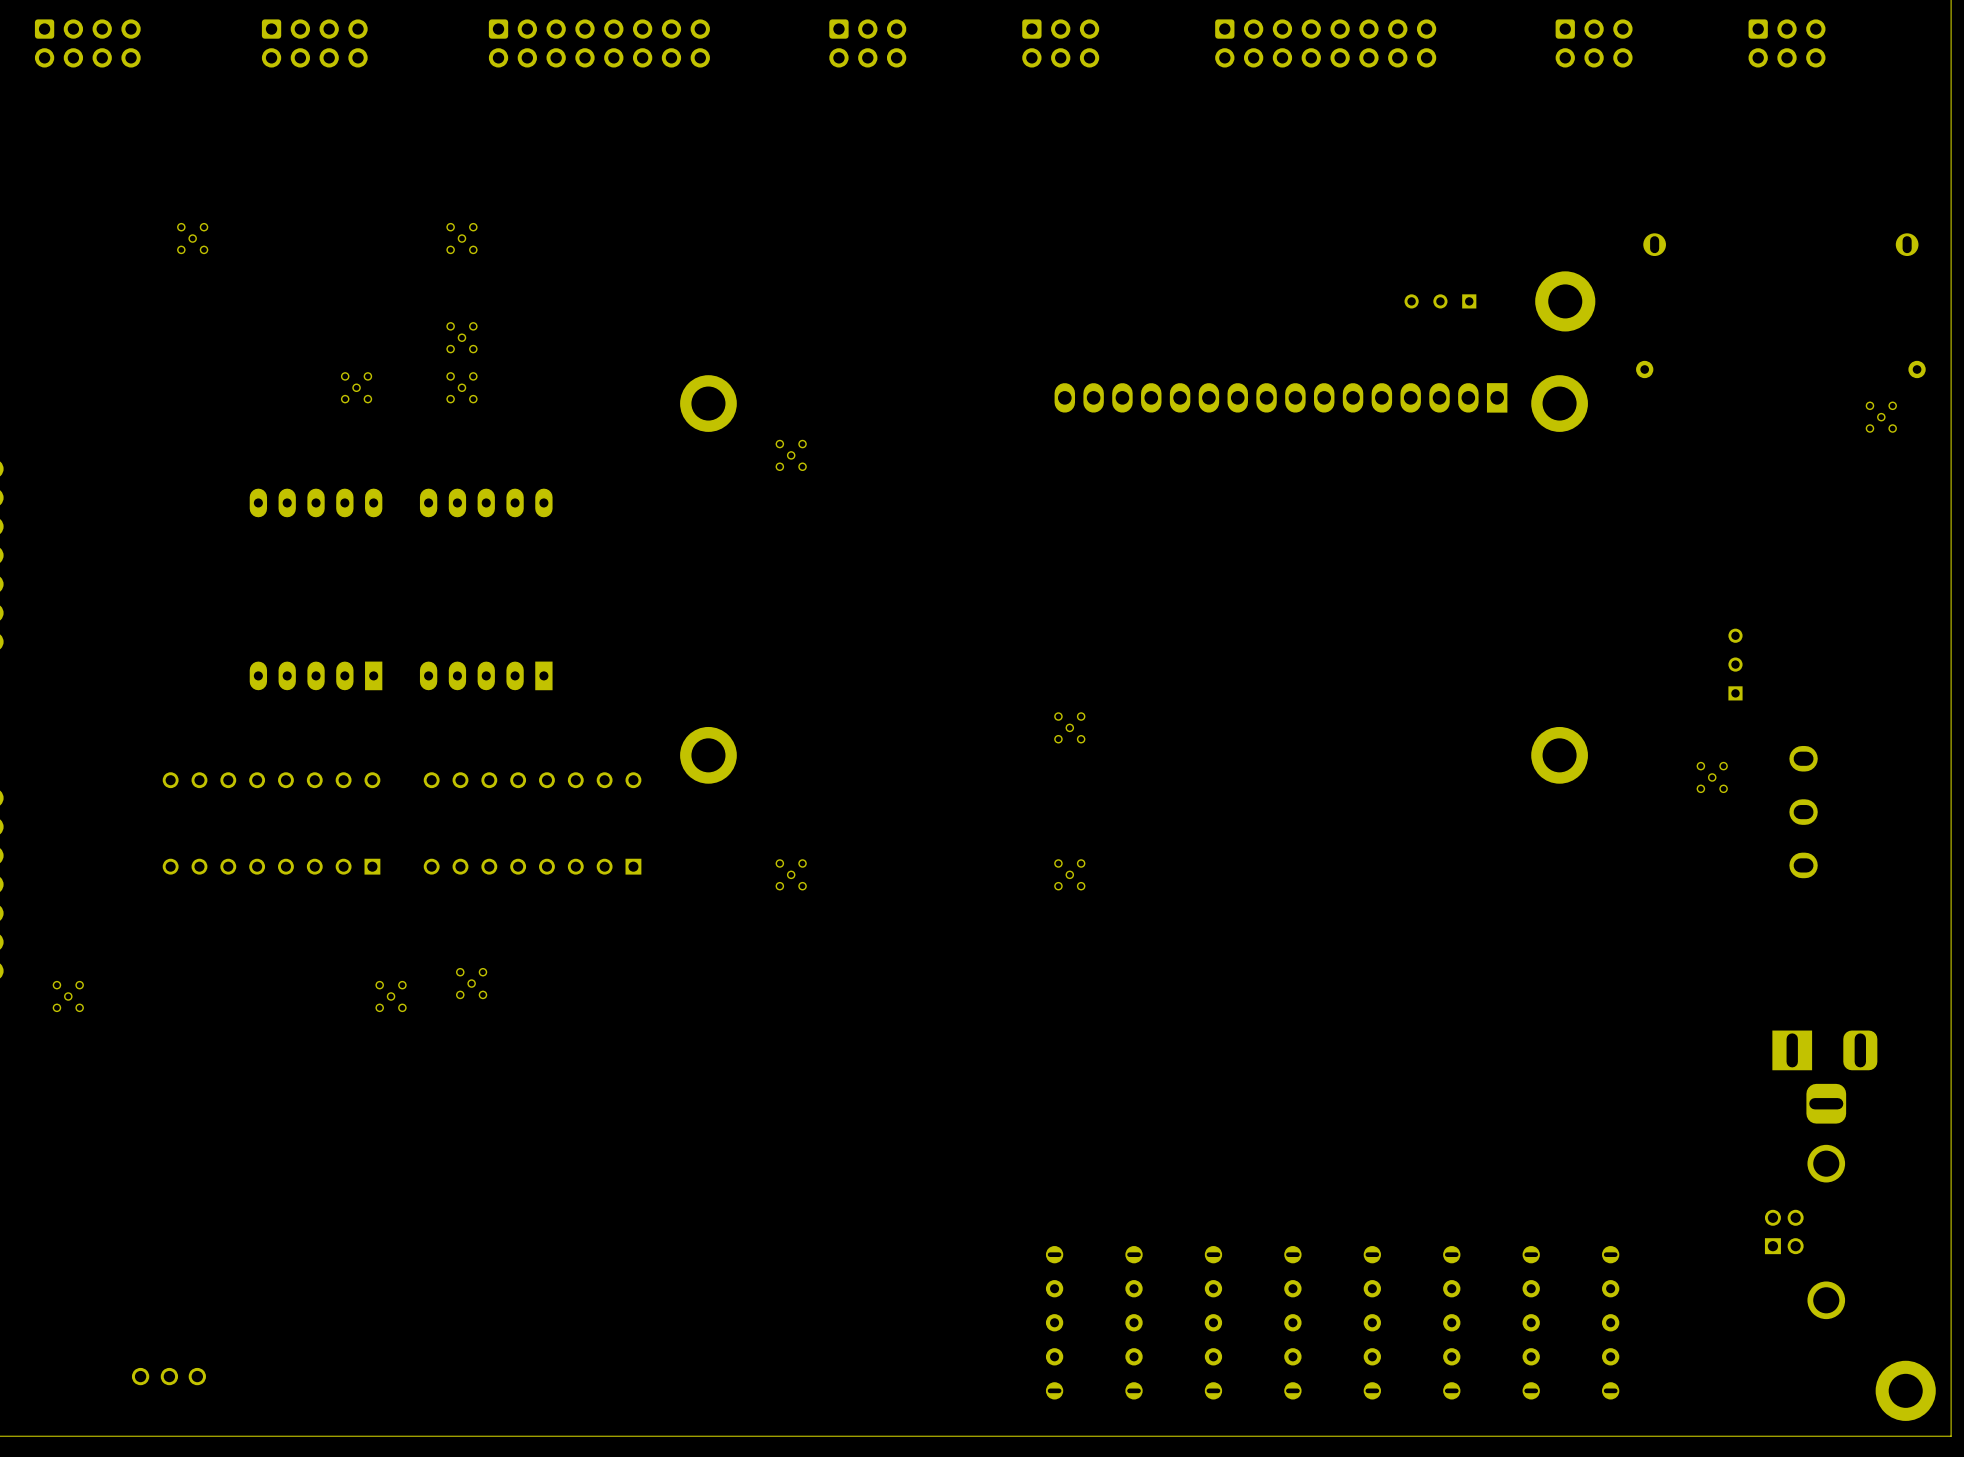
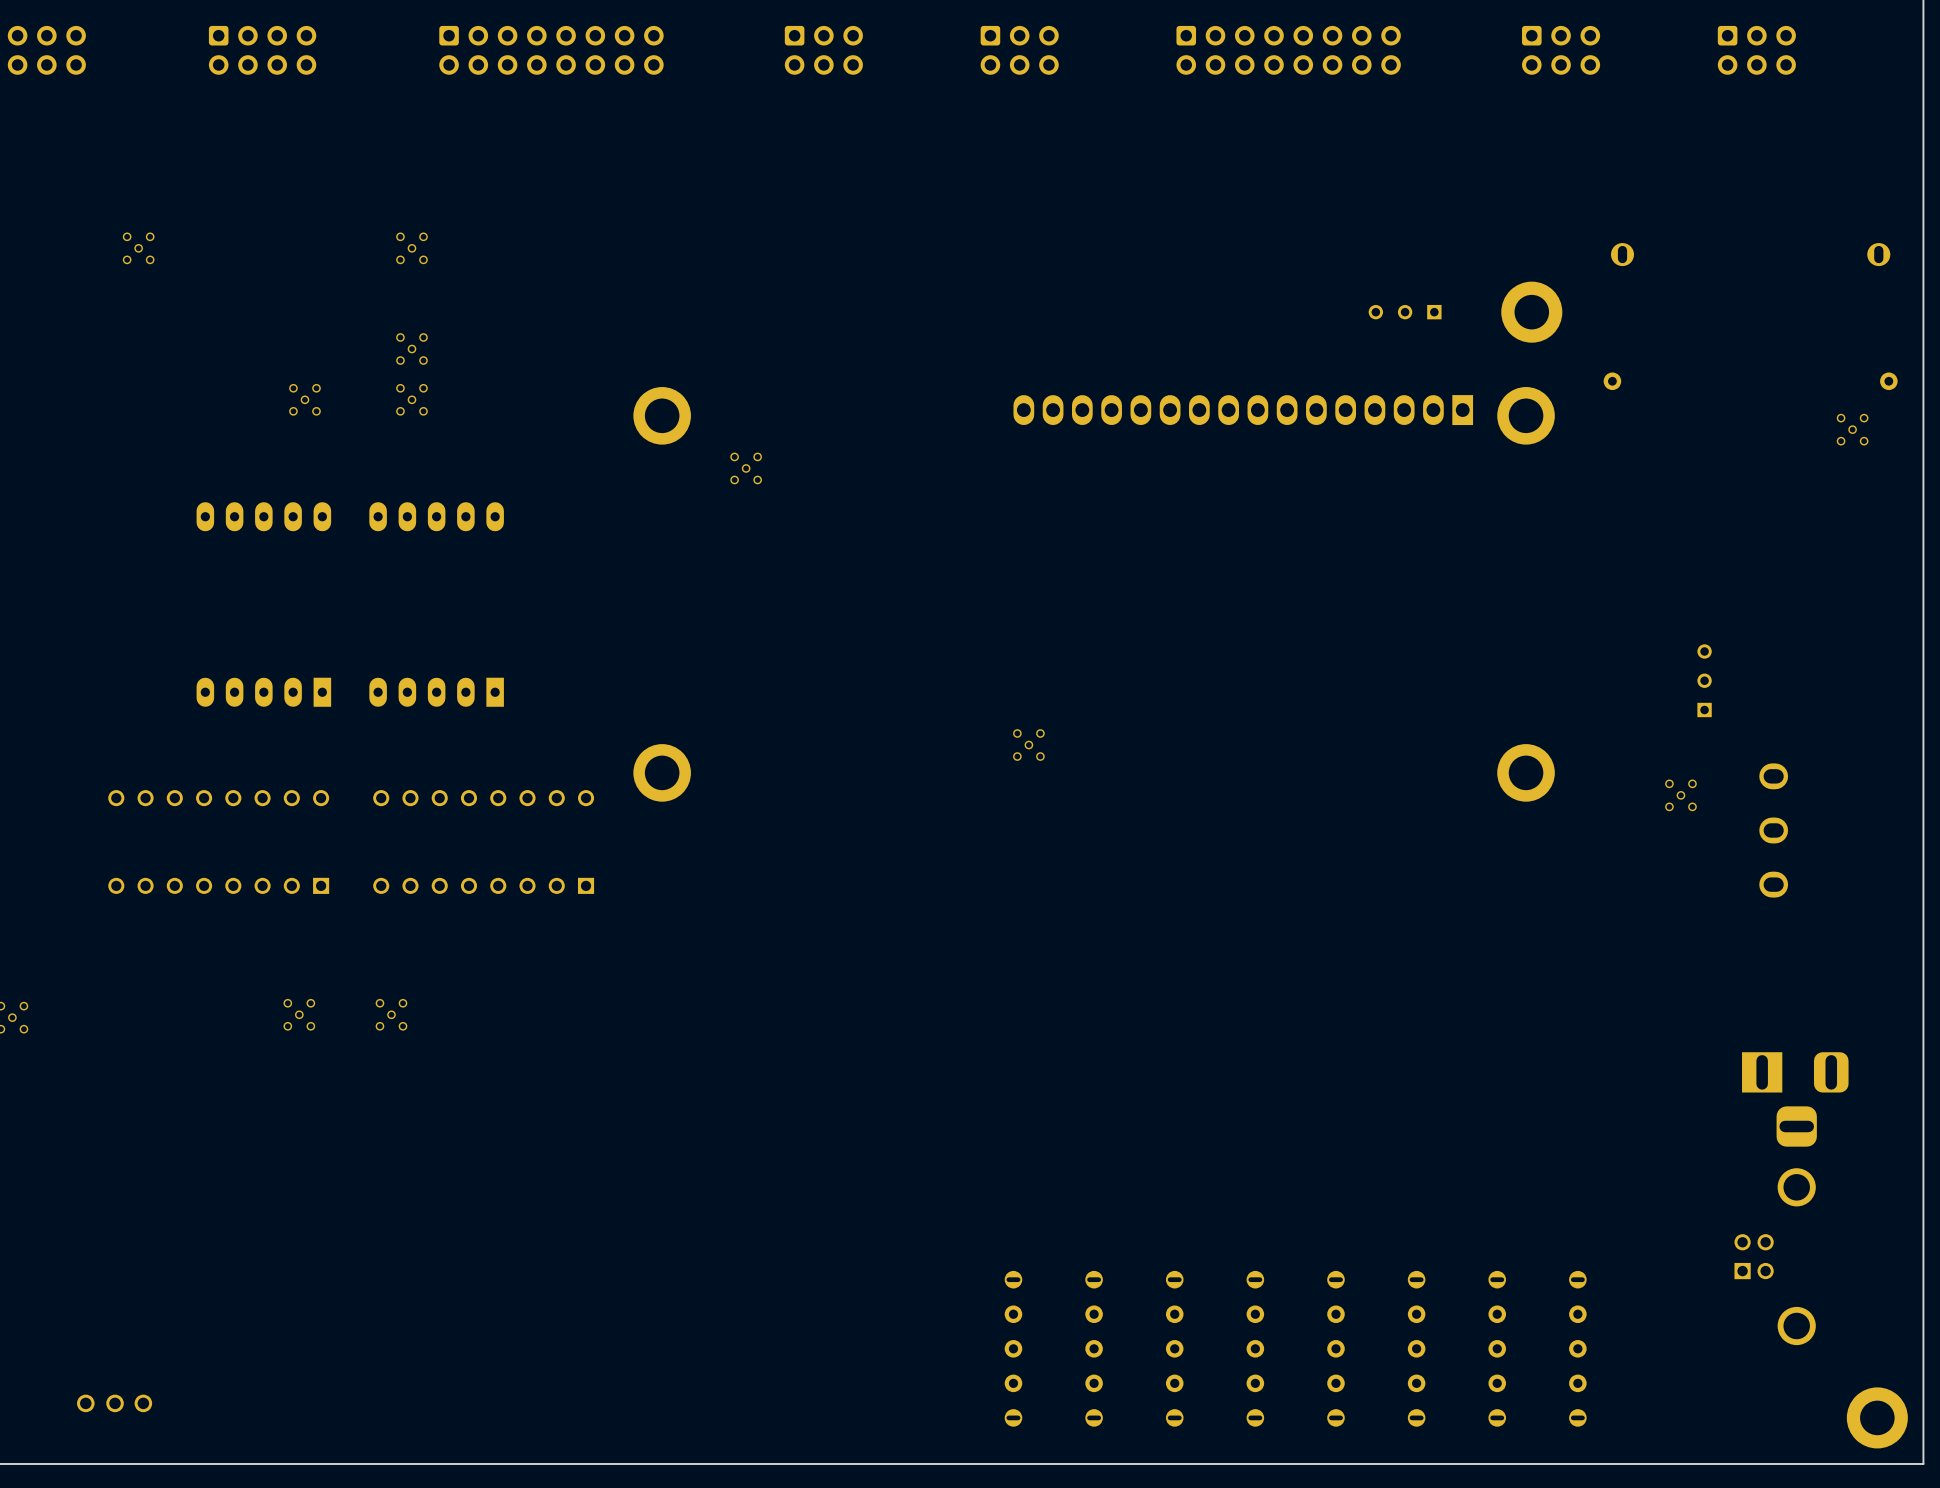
part: (791, 874) -> none
part: (1069, 874) -> none
part: (471, 983) -> none
part: none -> (299, 1014)
part: none -> (391, 1014)
part: (391, 996) -> none

